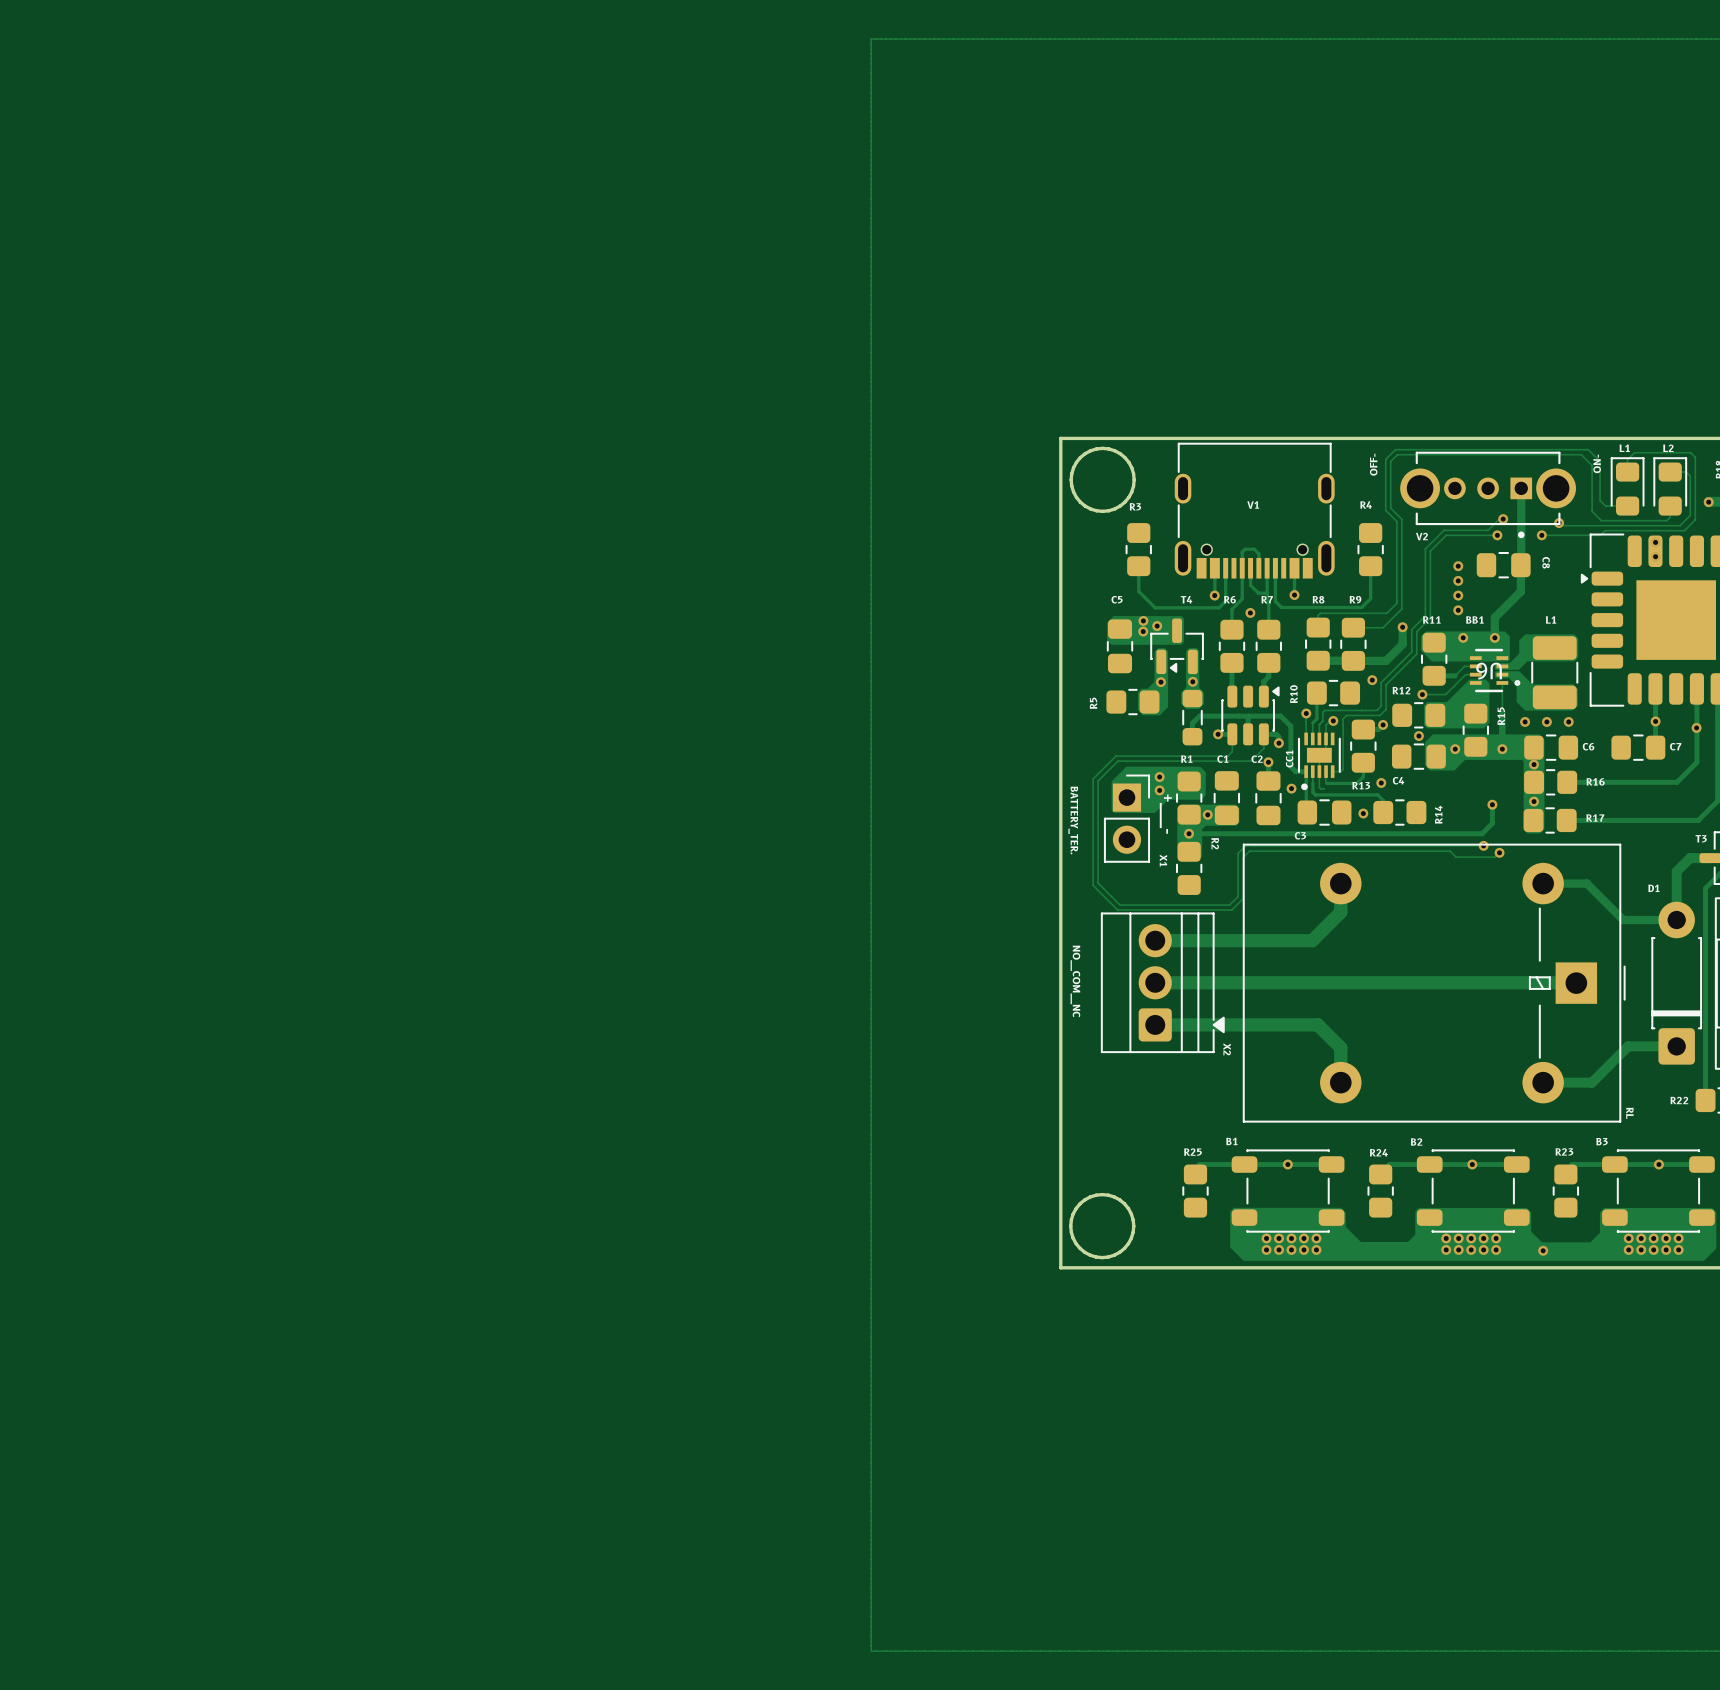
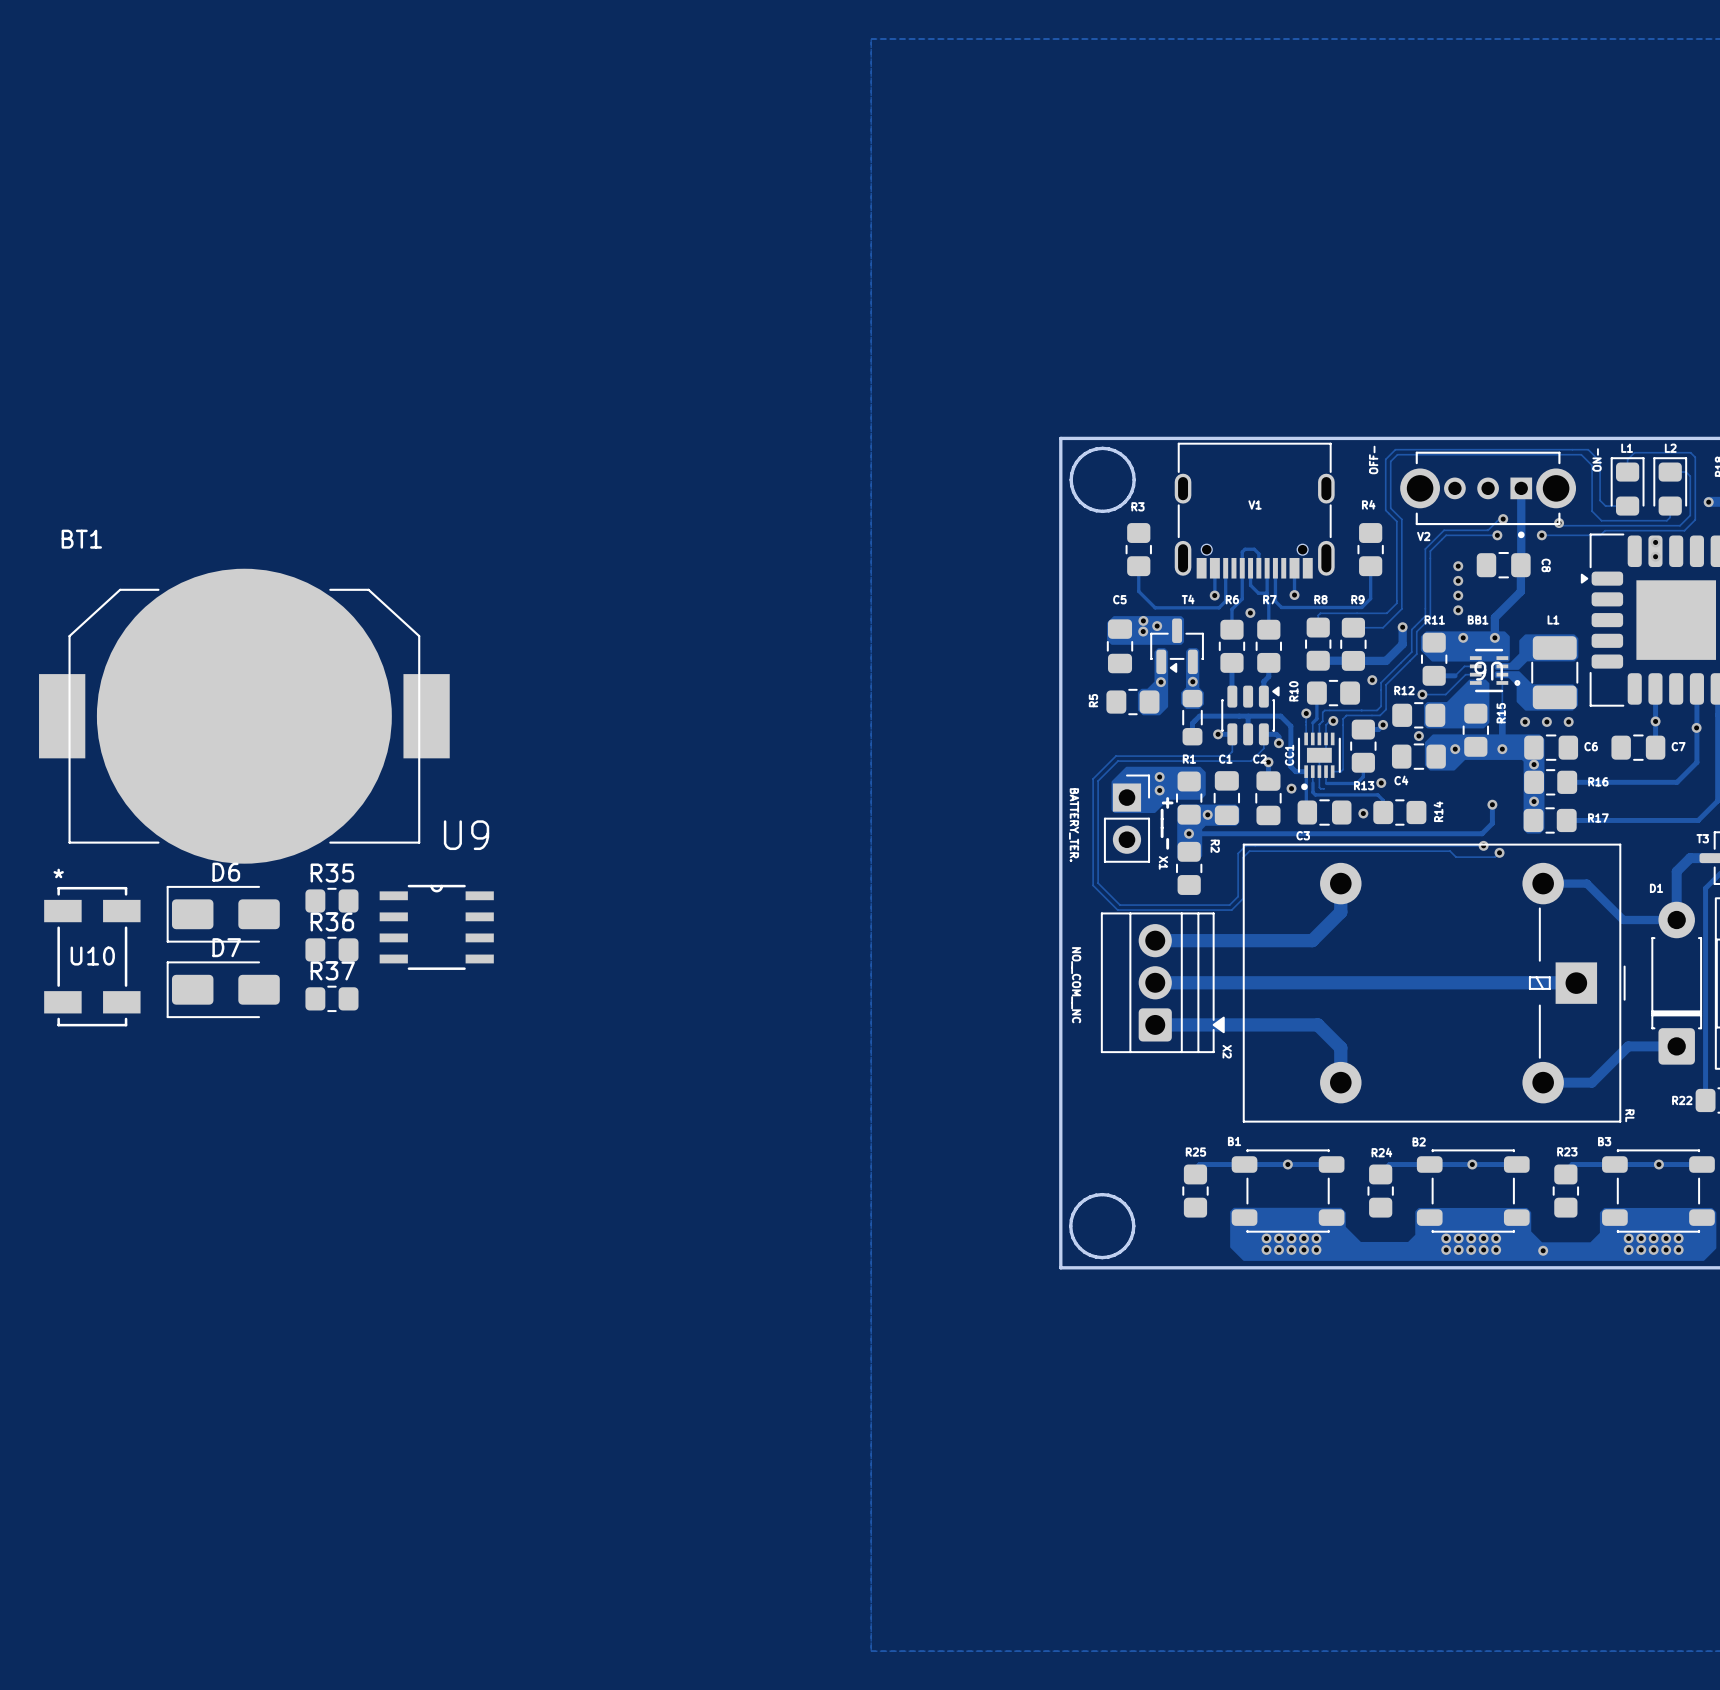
BT1: none -> (244, 716)
R35: none -> (331, 901)
D6: none -> (223, 914)
U9: none -> (436, 927)
R36: none -> (331, 949)
U10: none -> (92, 956)
D7: none -> (223, 989)
R37: none -> (331, 998)

